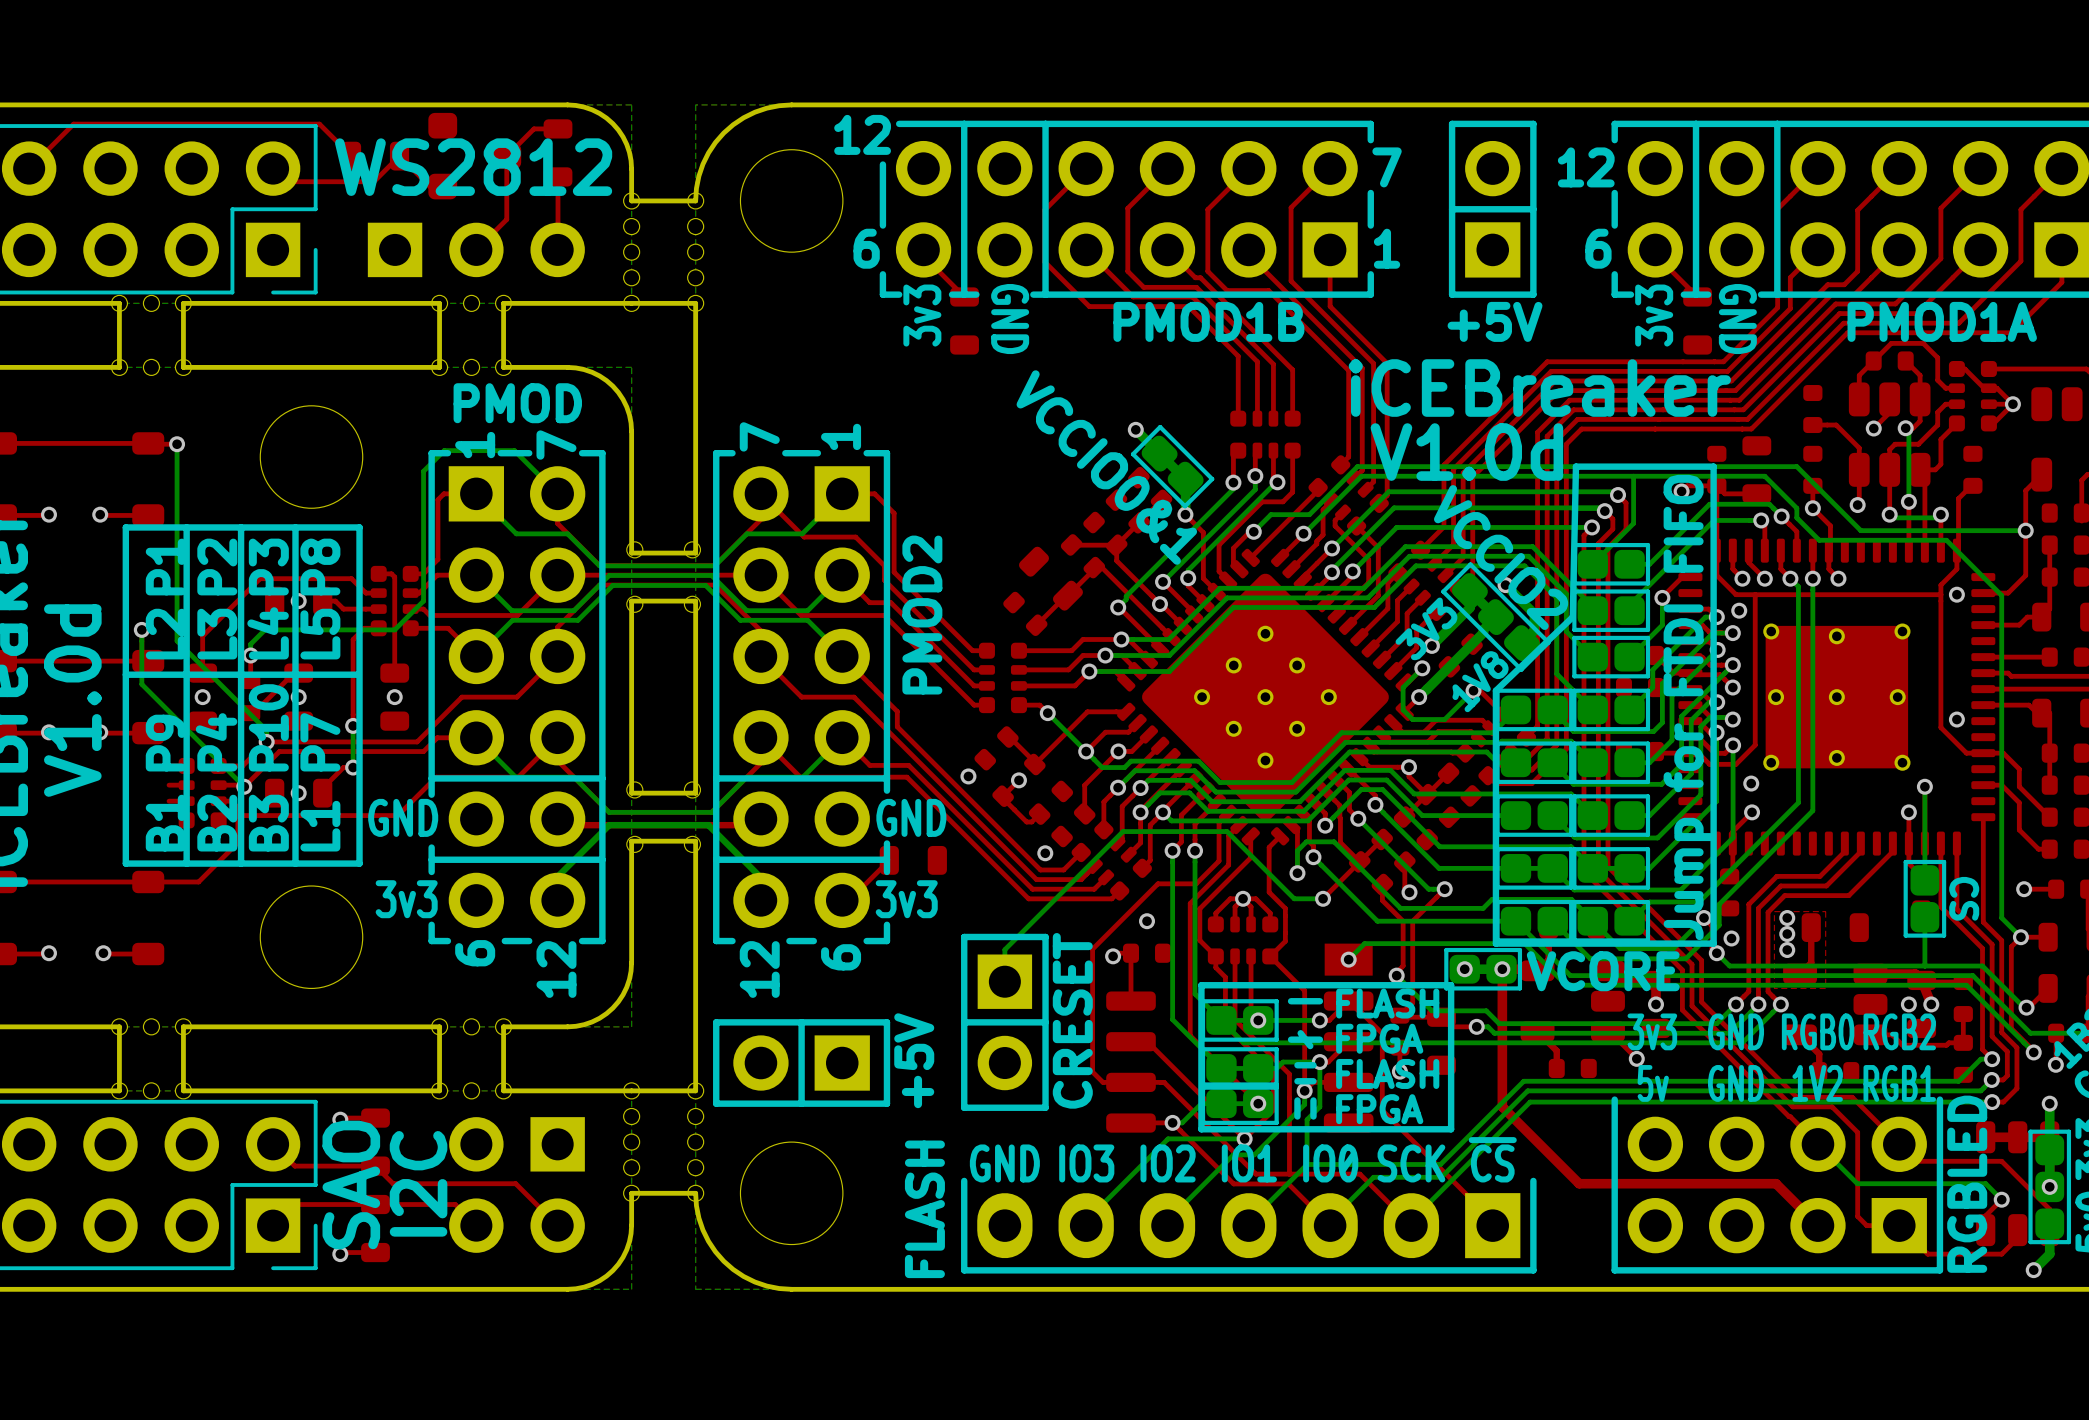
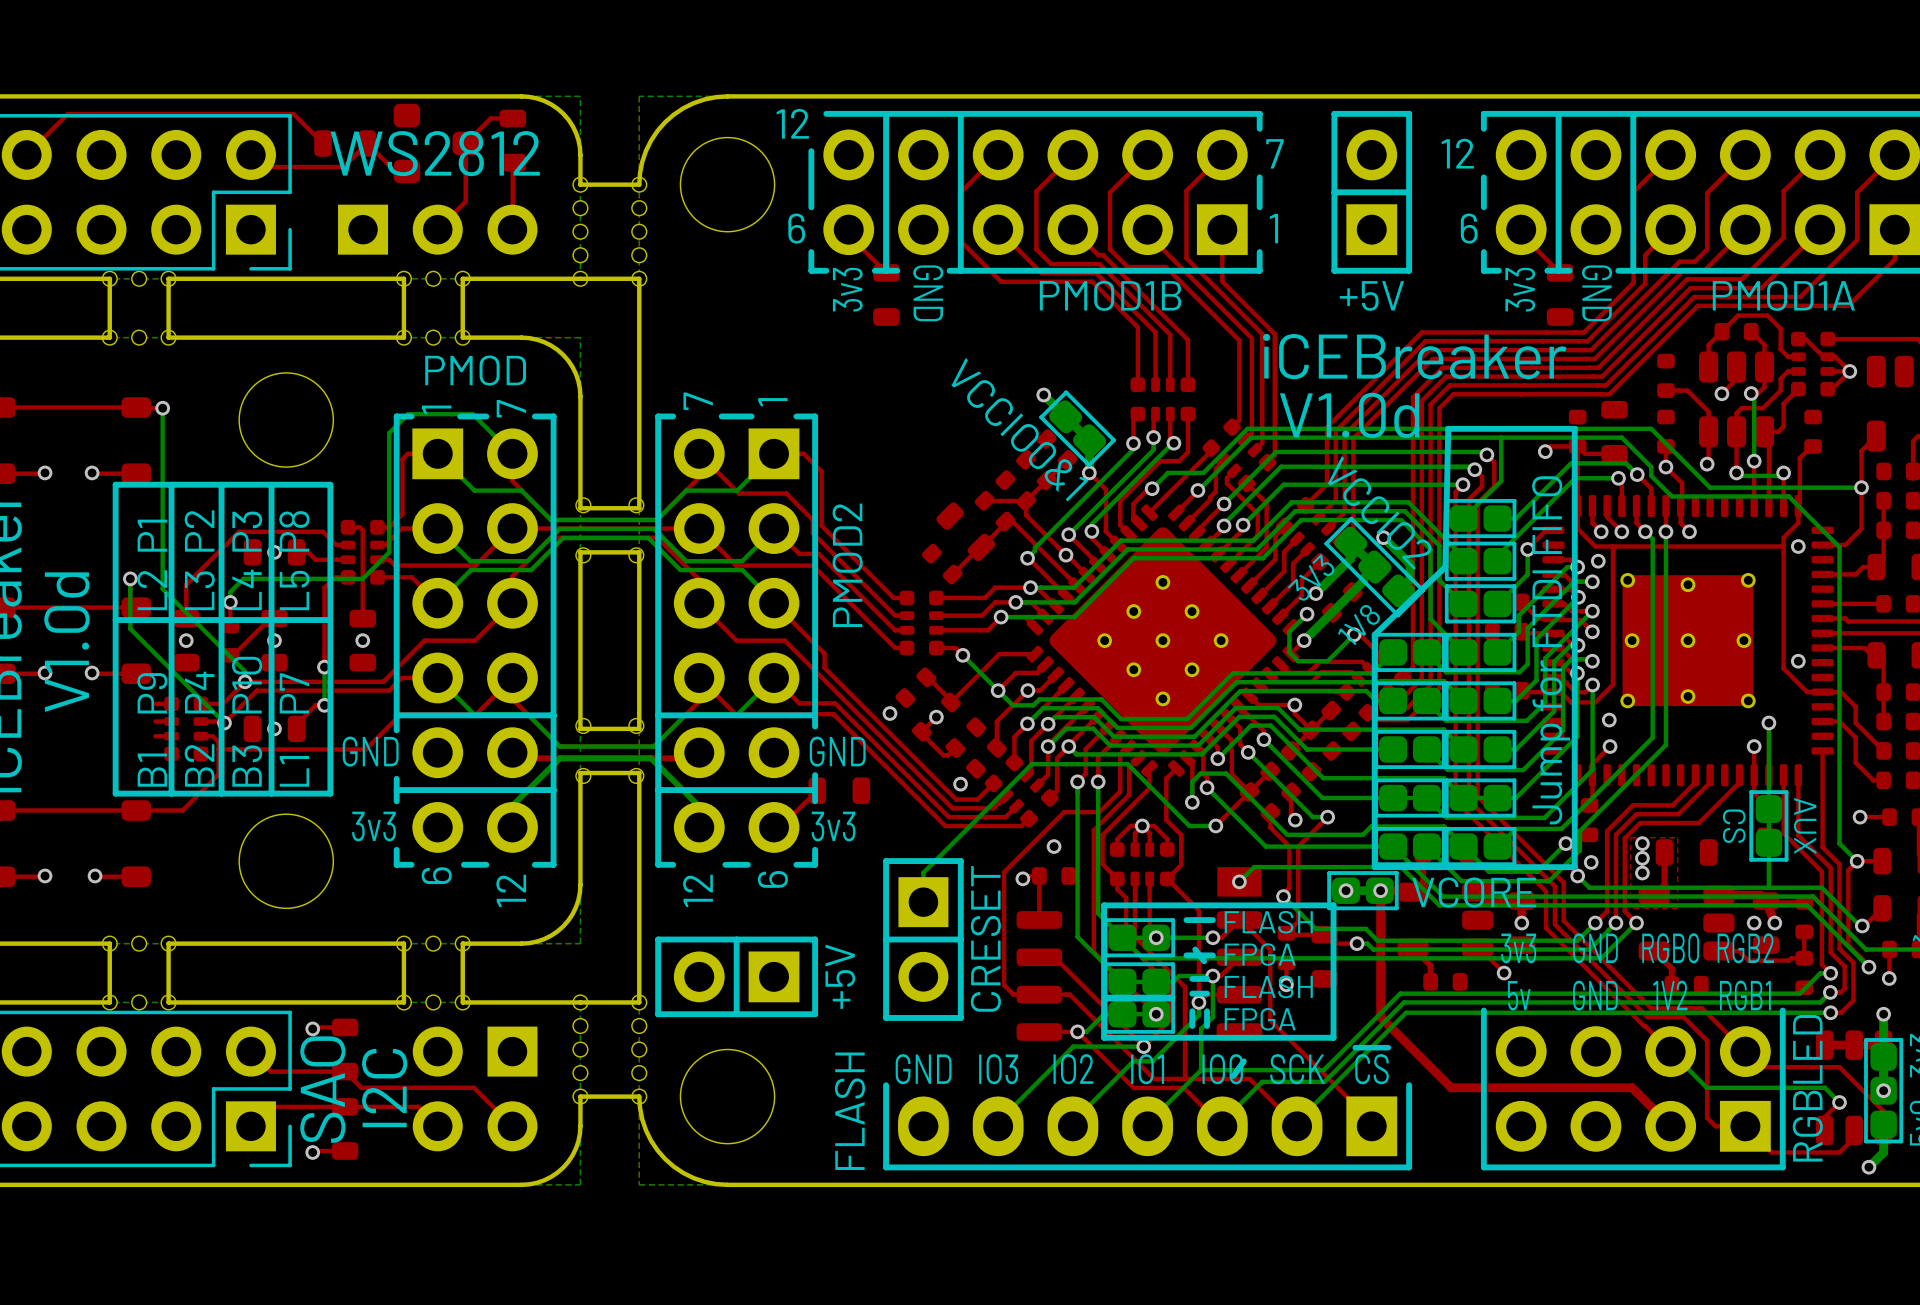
part footprint: [1903, 859, 1947, 938] -> [1749, 790, 1789, 862]
text: none -> CS (1734, 826)
text: CS (1964, 898) -> AUX (1805, 825)

